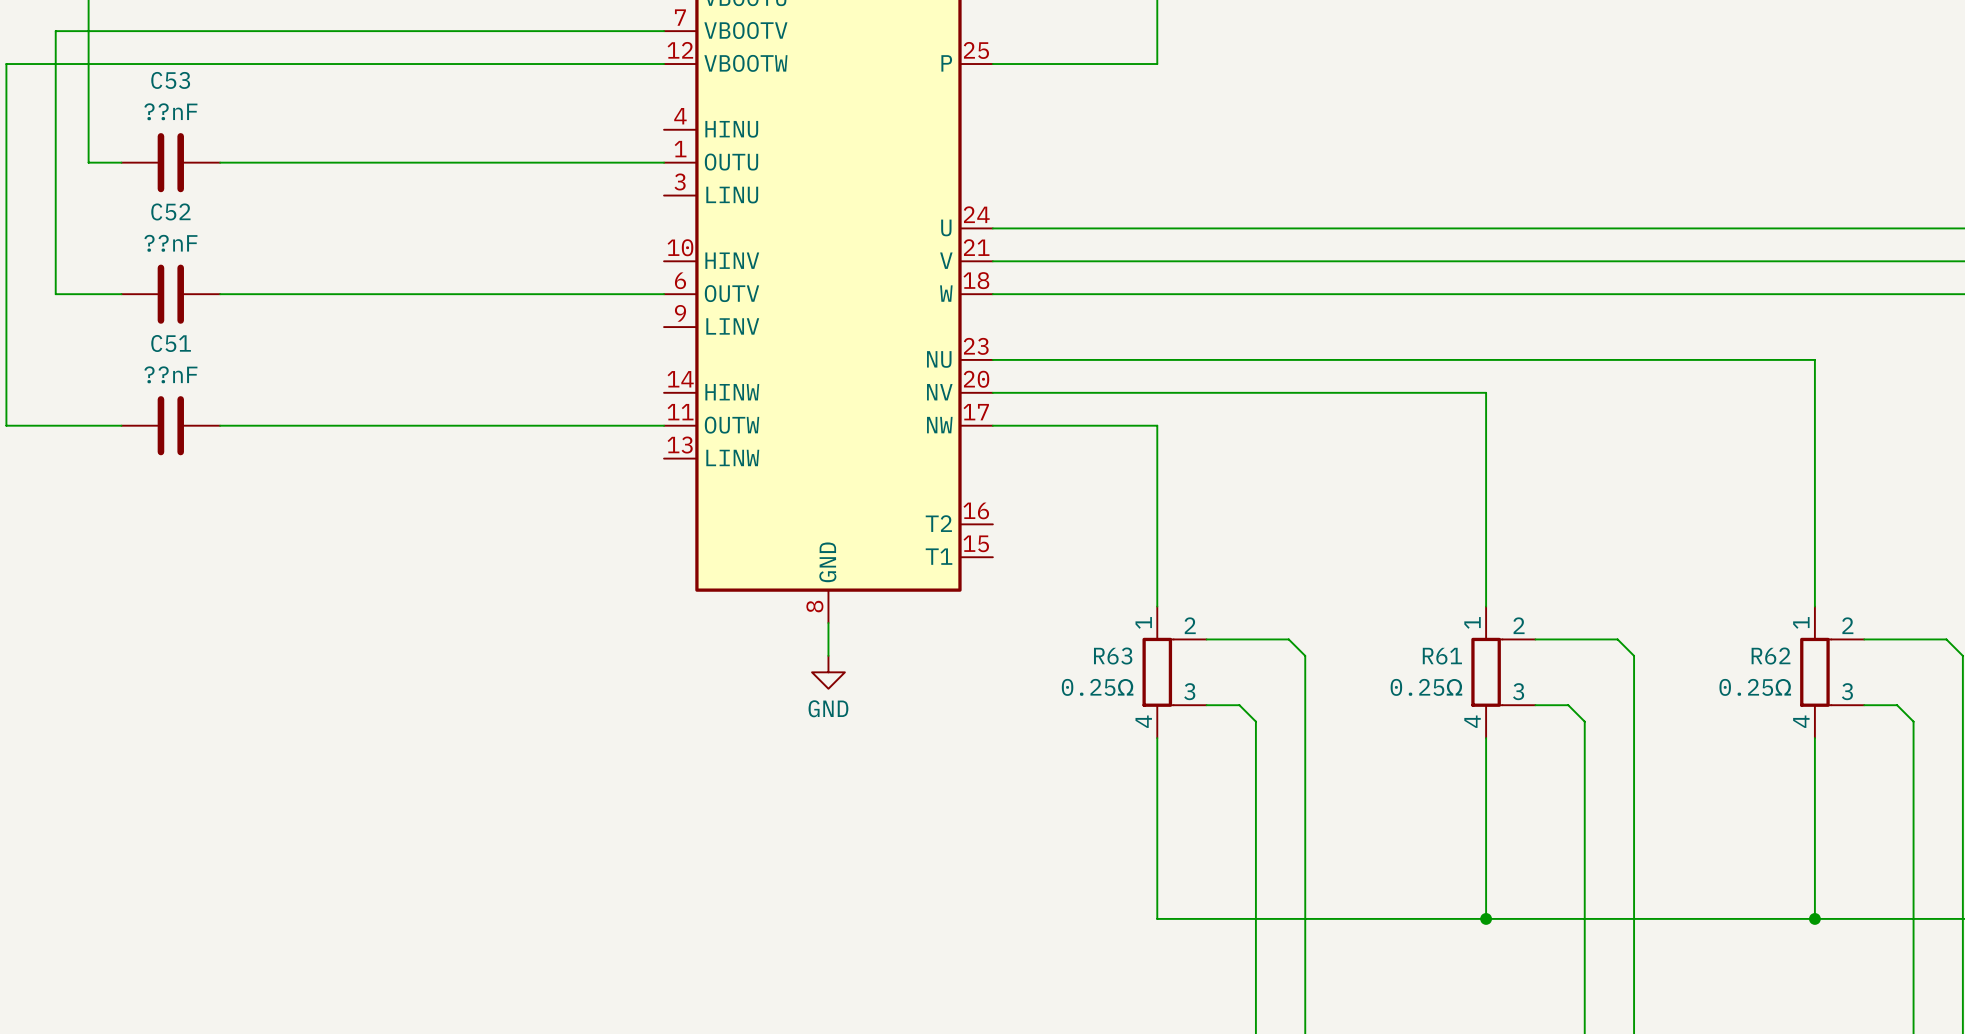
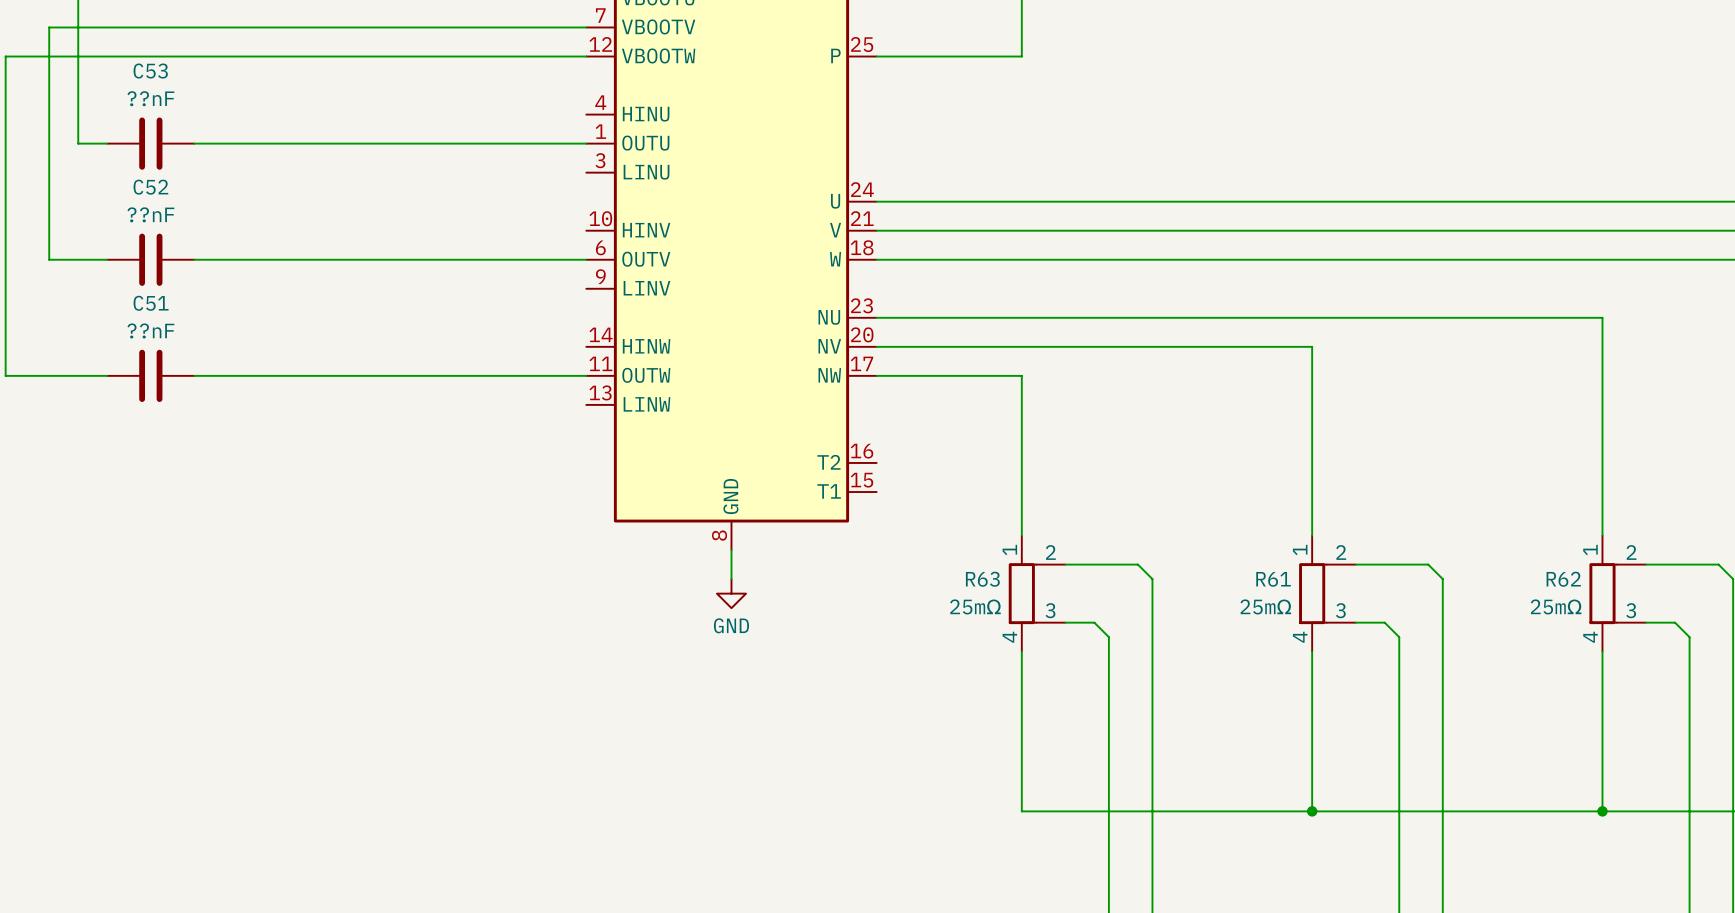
R63 value: 0.25Ω (1097, 687) -> 25mΩ (975, 606)
R61 value: 0.25Ω (1426, 687) -> 25mΩ (1265, 606)
R62 value: 0.25Ω (1755, 687) -> 25mΩ (1556, 606)

